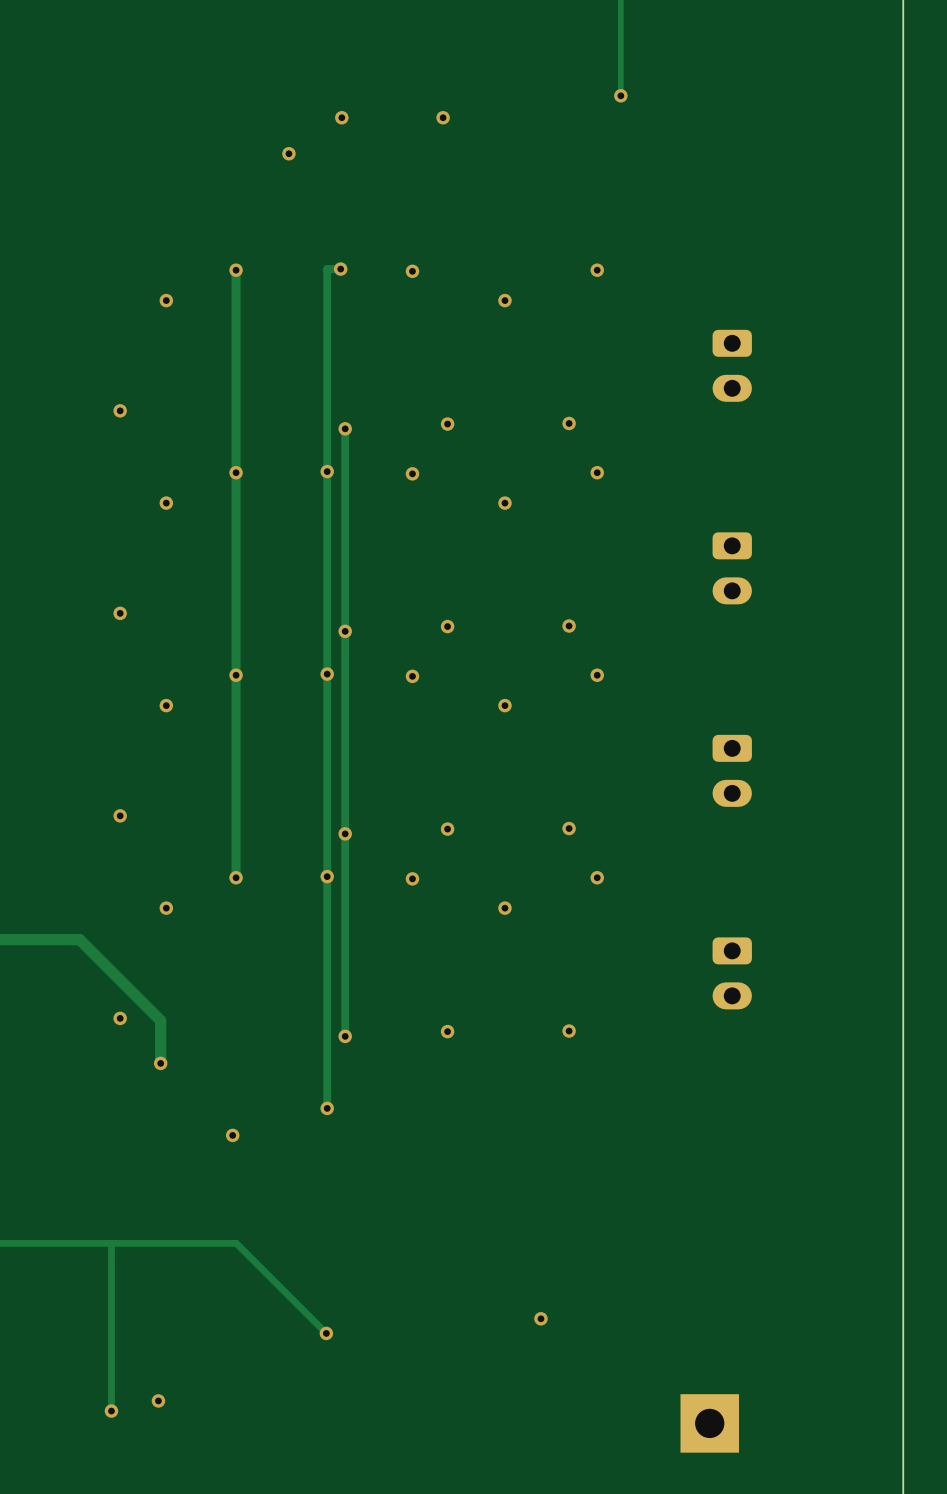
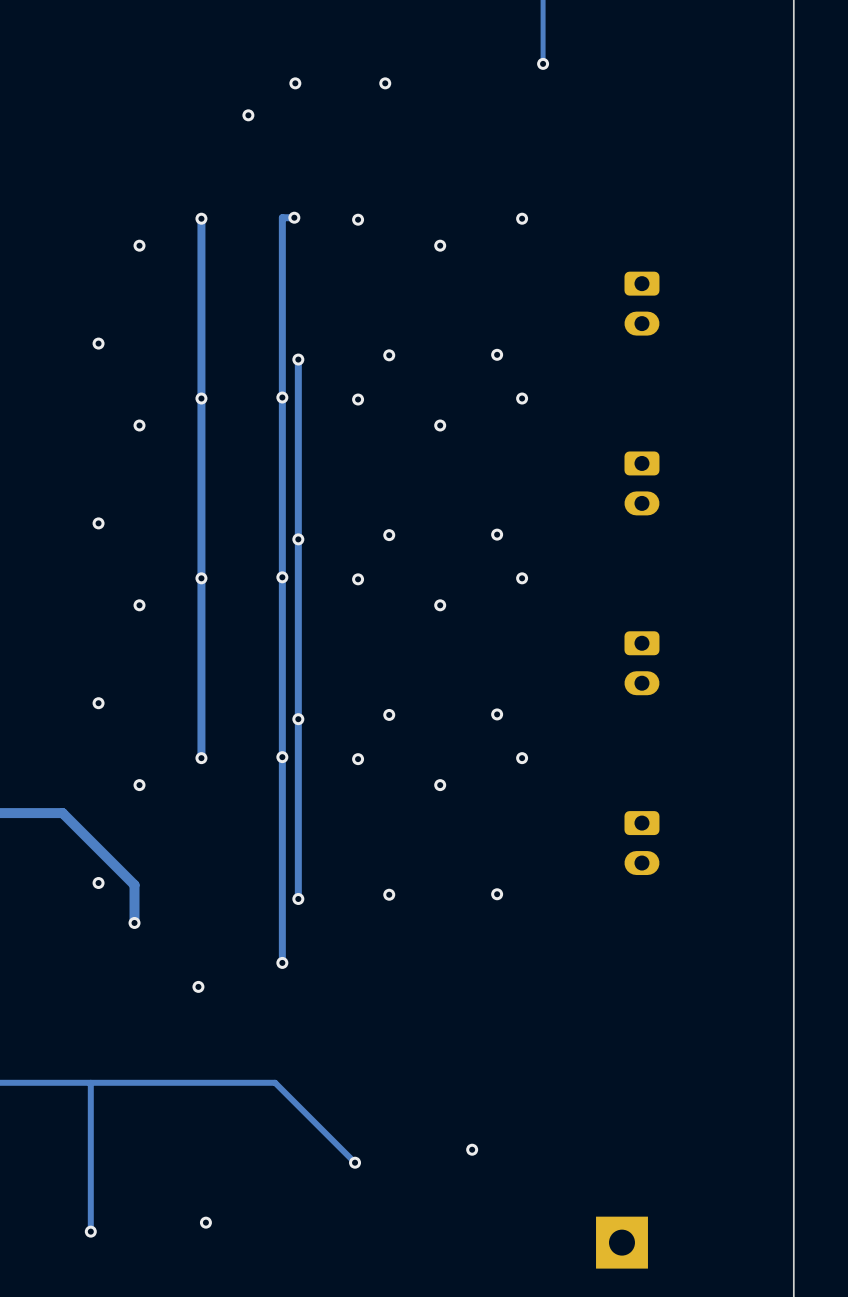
track: (236, 1243) (326, 1333) -> (201, 1082) (275, 1082) (355, 1162)
via: (326, 1333) -> none
via: none -> (355, 1162)
via: (158, 1400) -> none
via: none -> (205, 1222)

